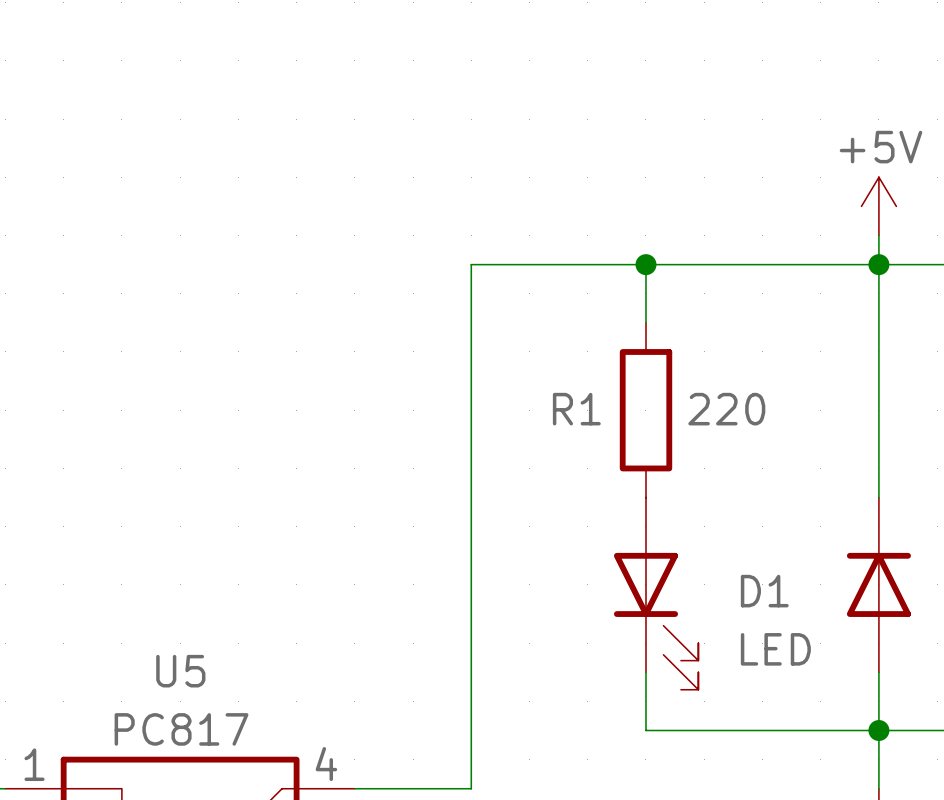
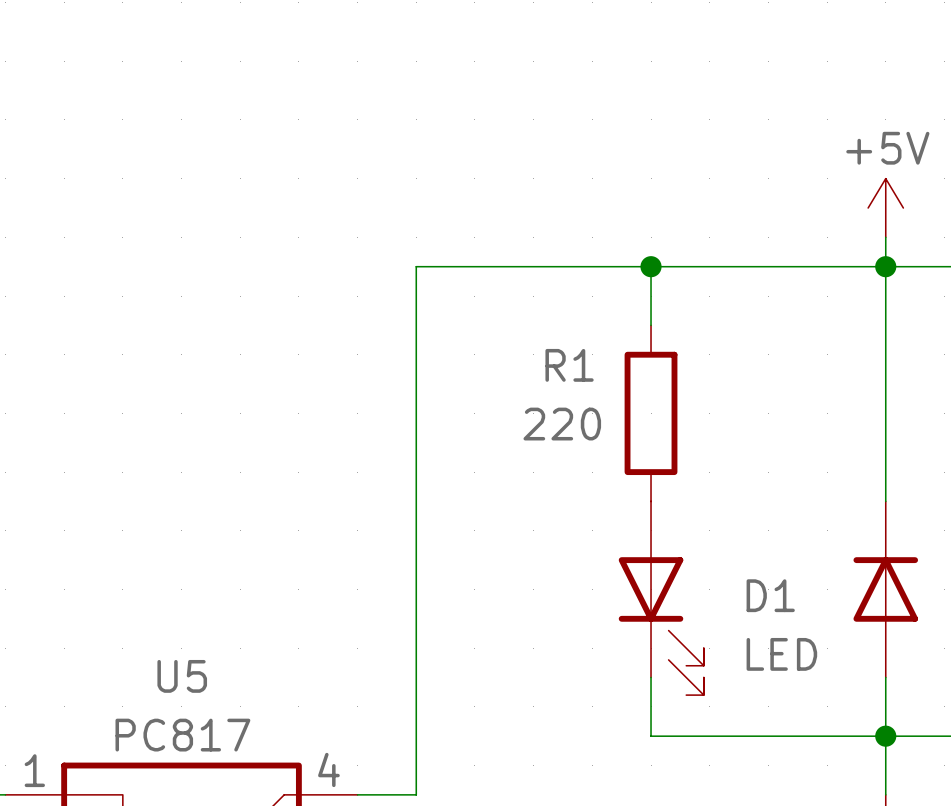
wire: (471, 264) (471, 788) (413, 788) -> (474, 266) (416, 266) (416, 794)
R1 name position: R1 (576, 409) -> R1 (569, 365)
R1 value position: 220 (726, 409) -> 220 (562, 424)

